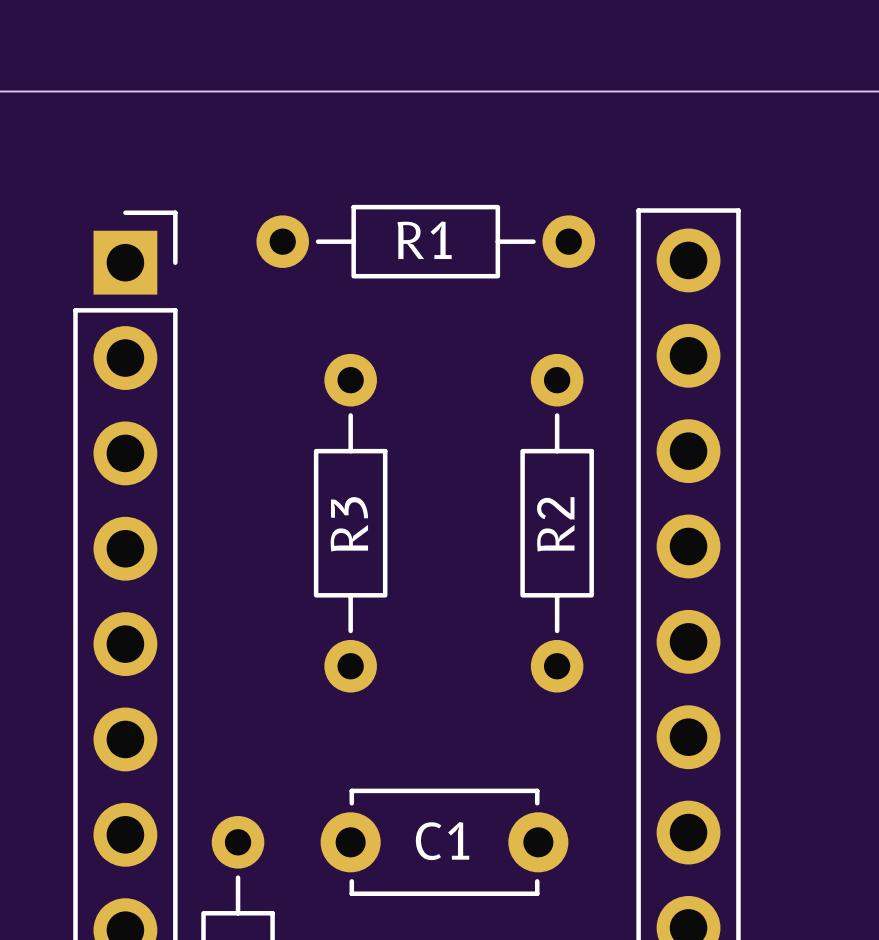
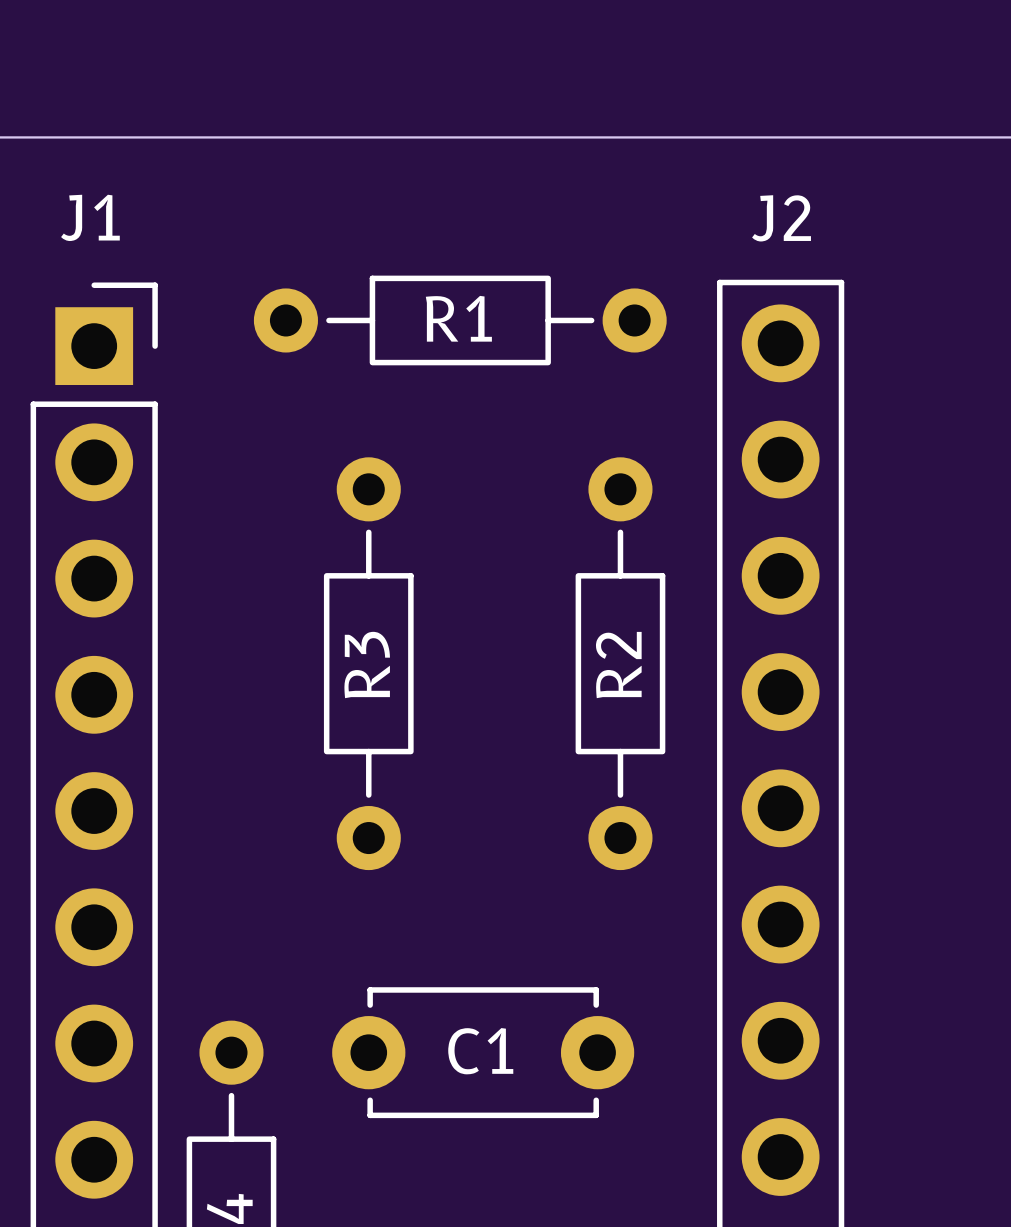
J1 name: none -> J1 (90, 217)
J2 name: none -> J2 (781, 218)

